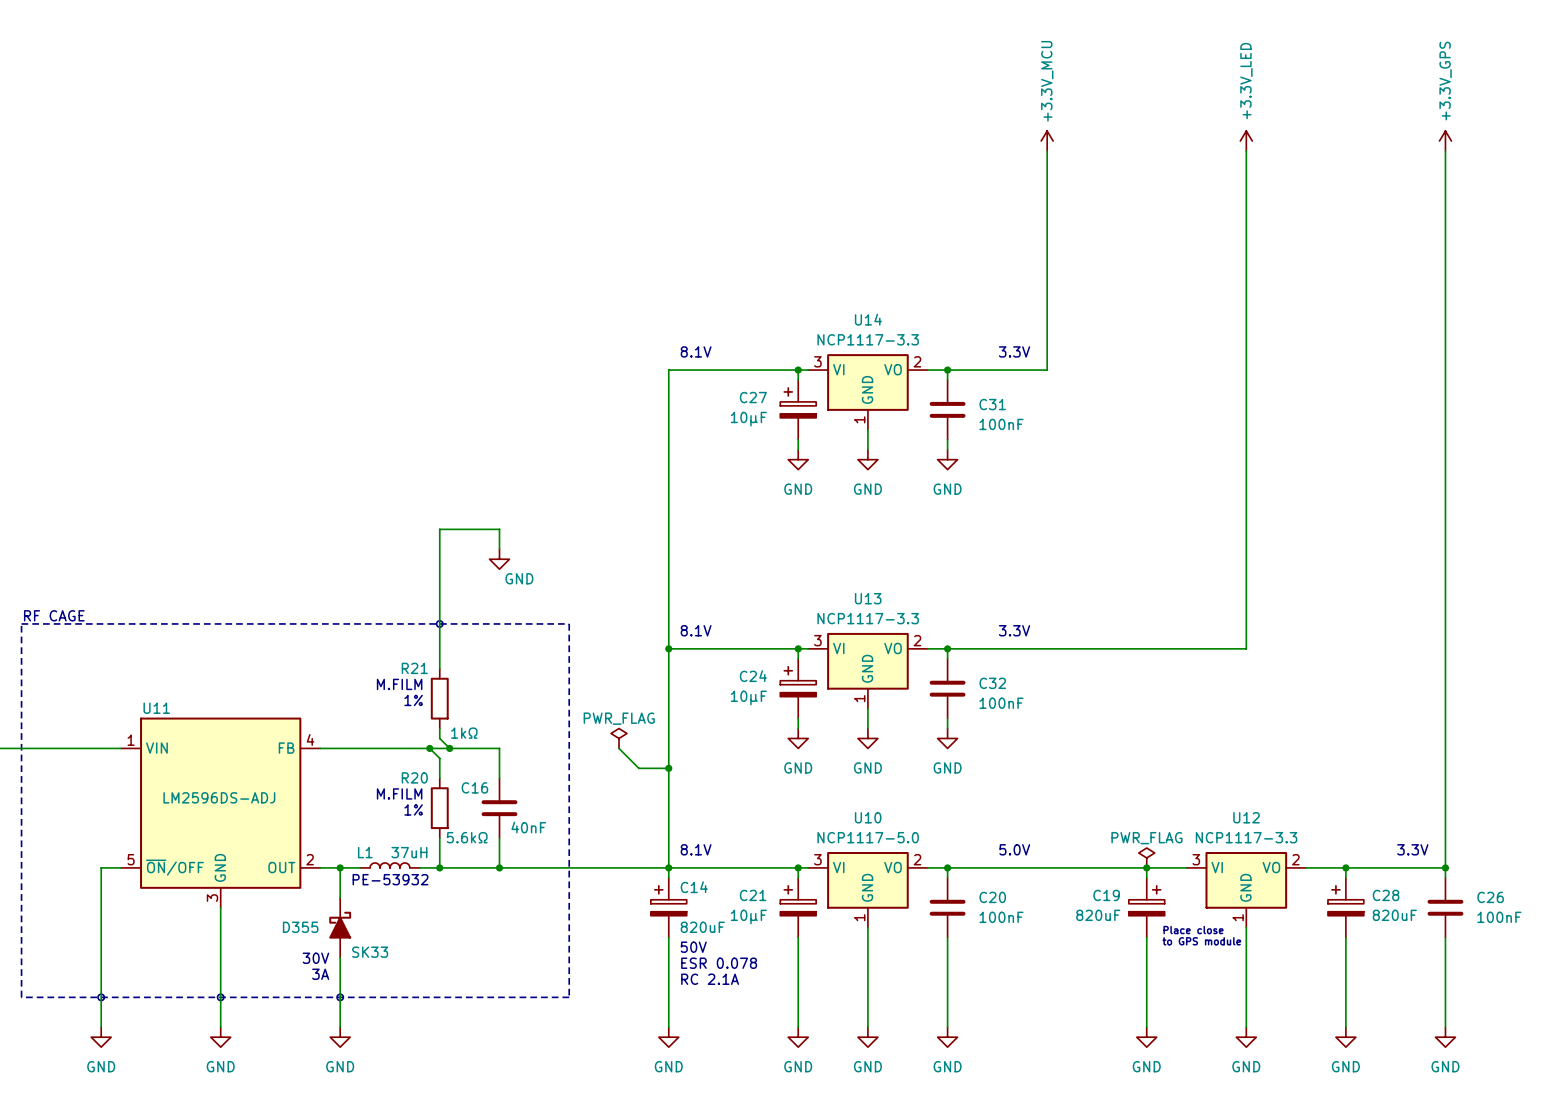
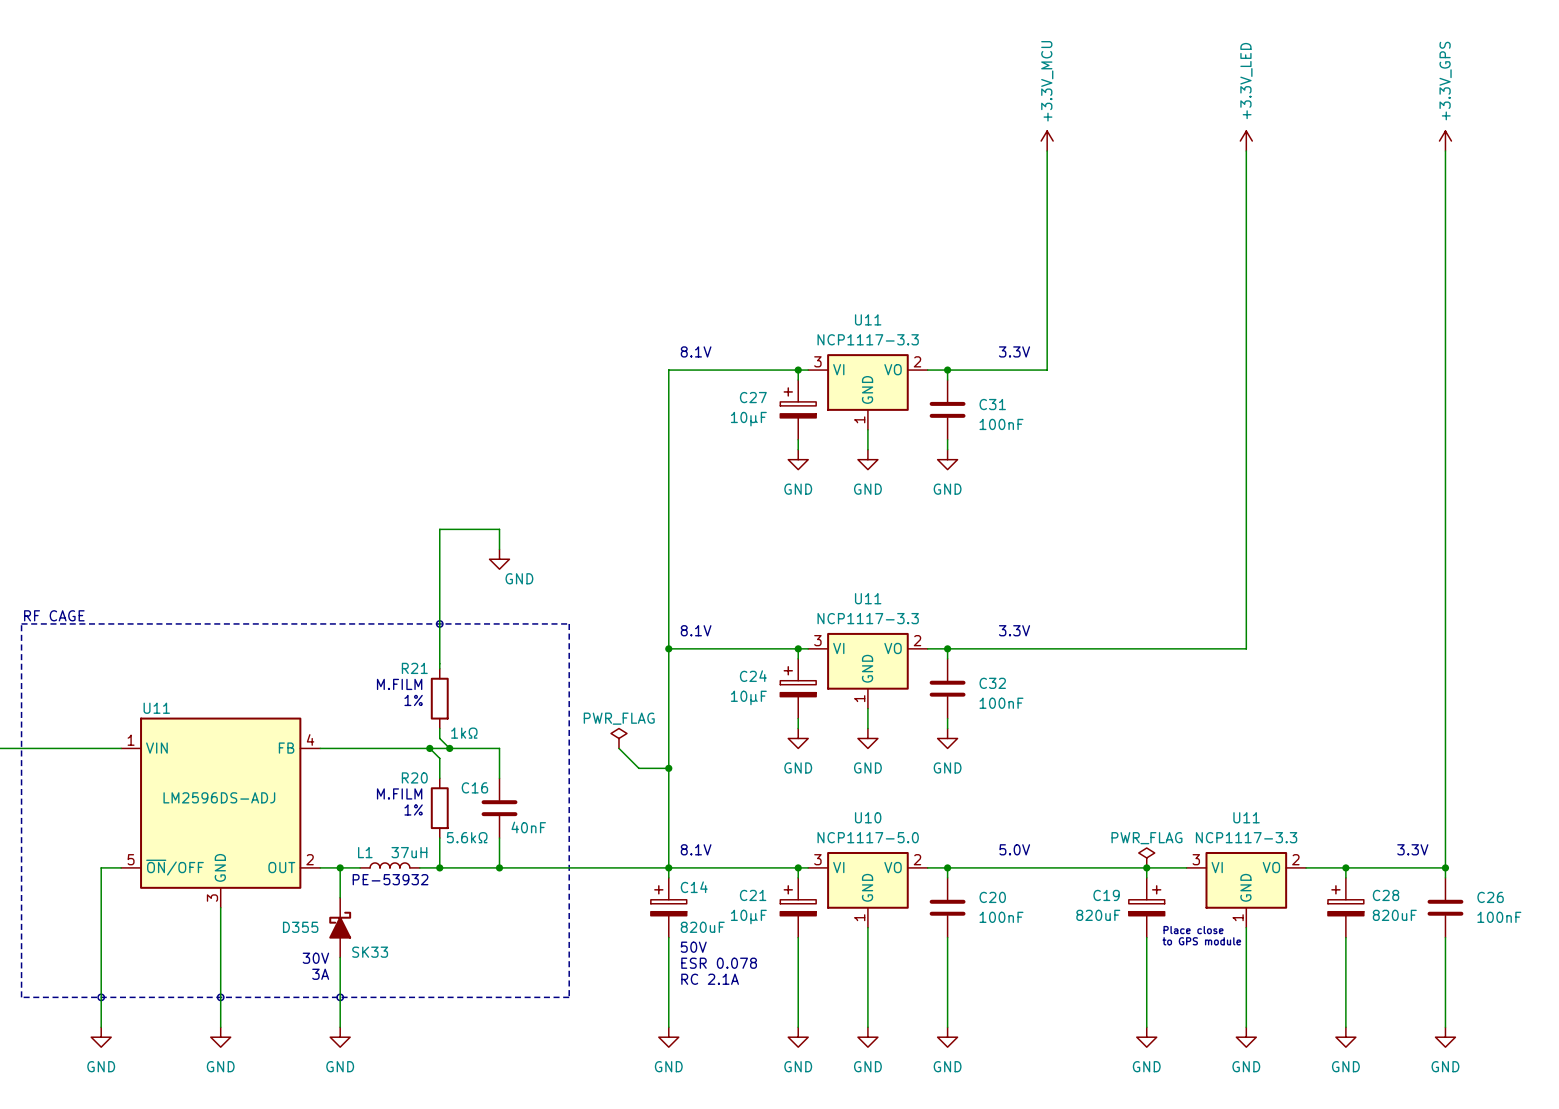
U14 name: U14 (868, 319) -> U11 (868, 319)
U13 name: U13 (868, 598) -> U11 (868, 598)
U12 name: U12 (1246, 817) -> U11 (1246, 817)

